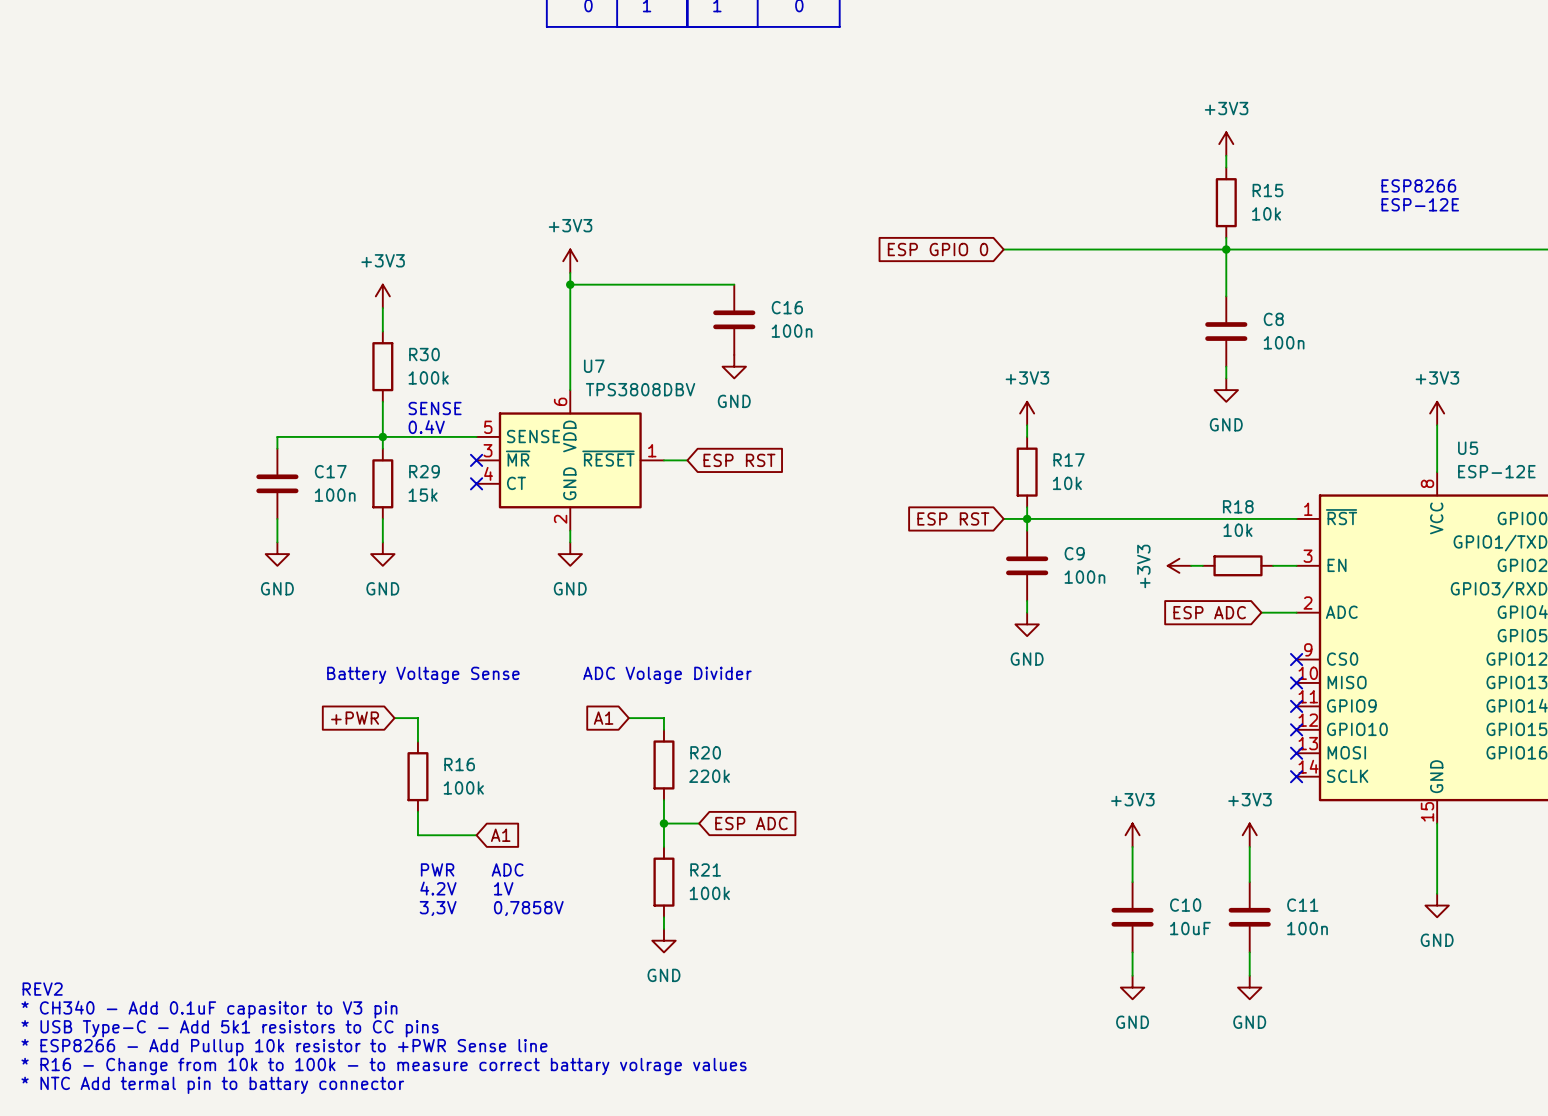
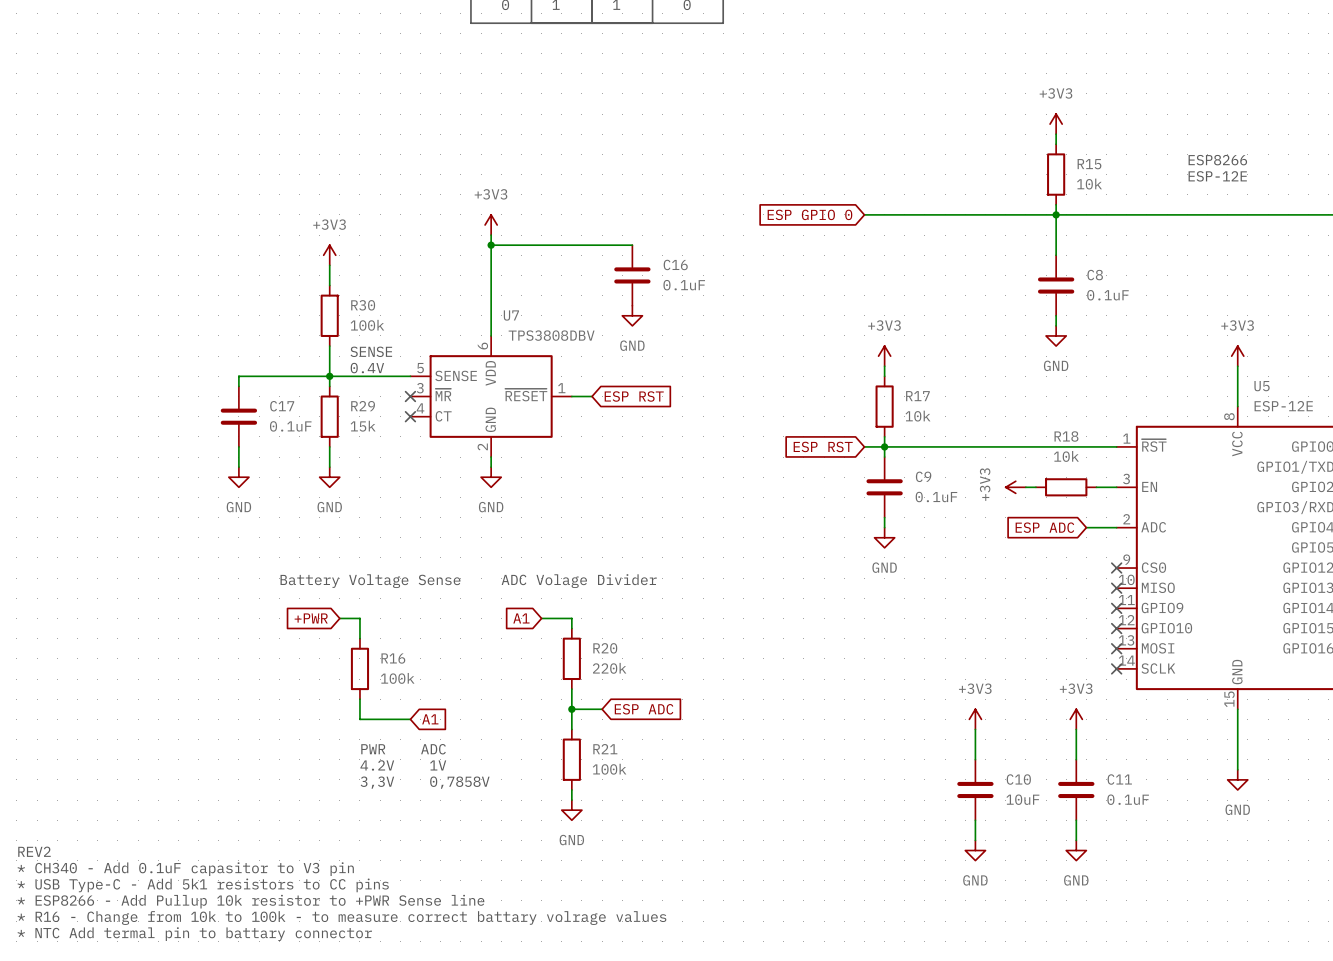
C16 value: 100n (792, 331) -> 0.1uF (684, 285)
C8 value: 100n (1284, 342) -> 0.1uF (1107, 295)
C17 value: 100n (335, 495) -> 0.1uF (290, 426)
C9 value: 100n (1084, 577) -> 0.1uF (936, 497)
C11 value: 100n (1307, 928) -> 0.1uF (1128, 799)

